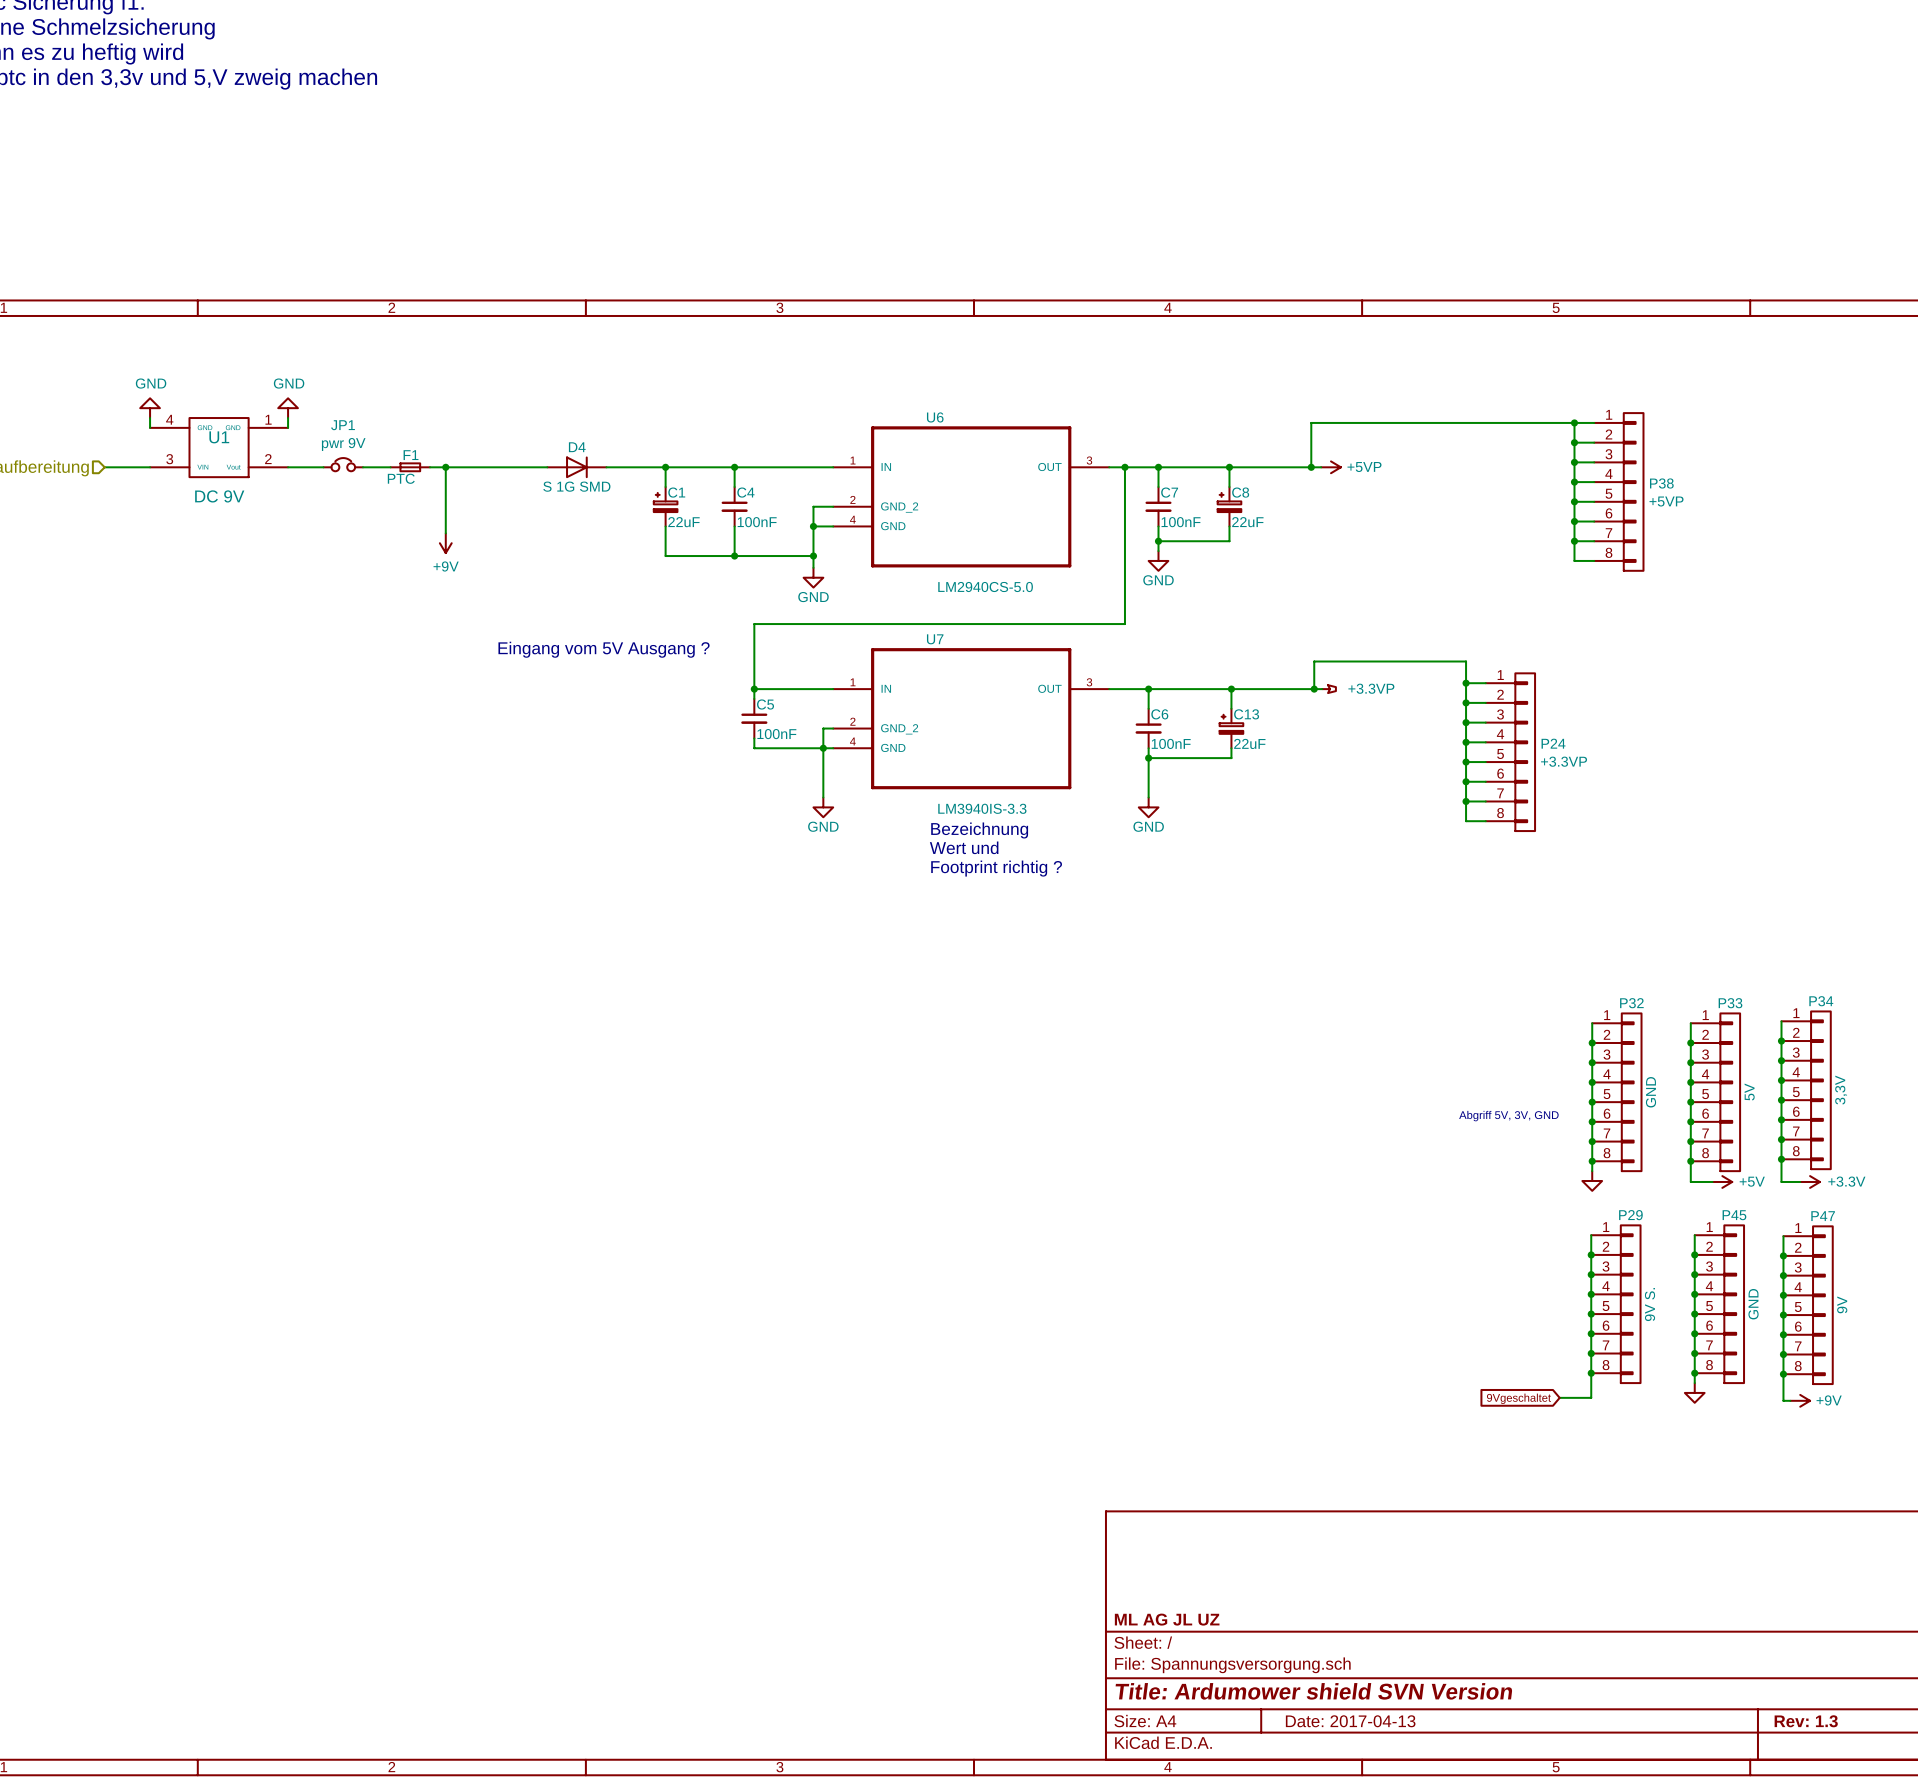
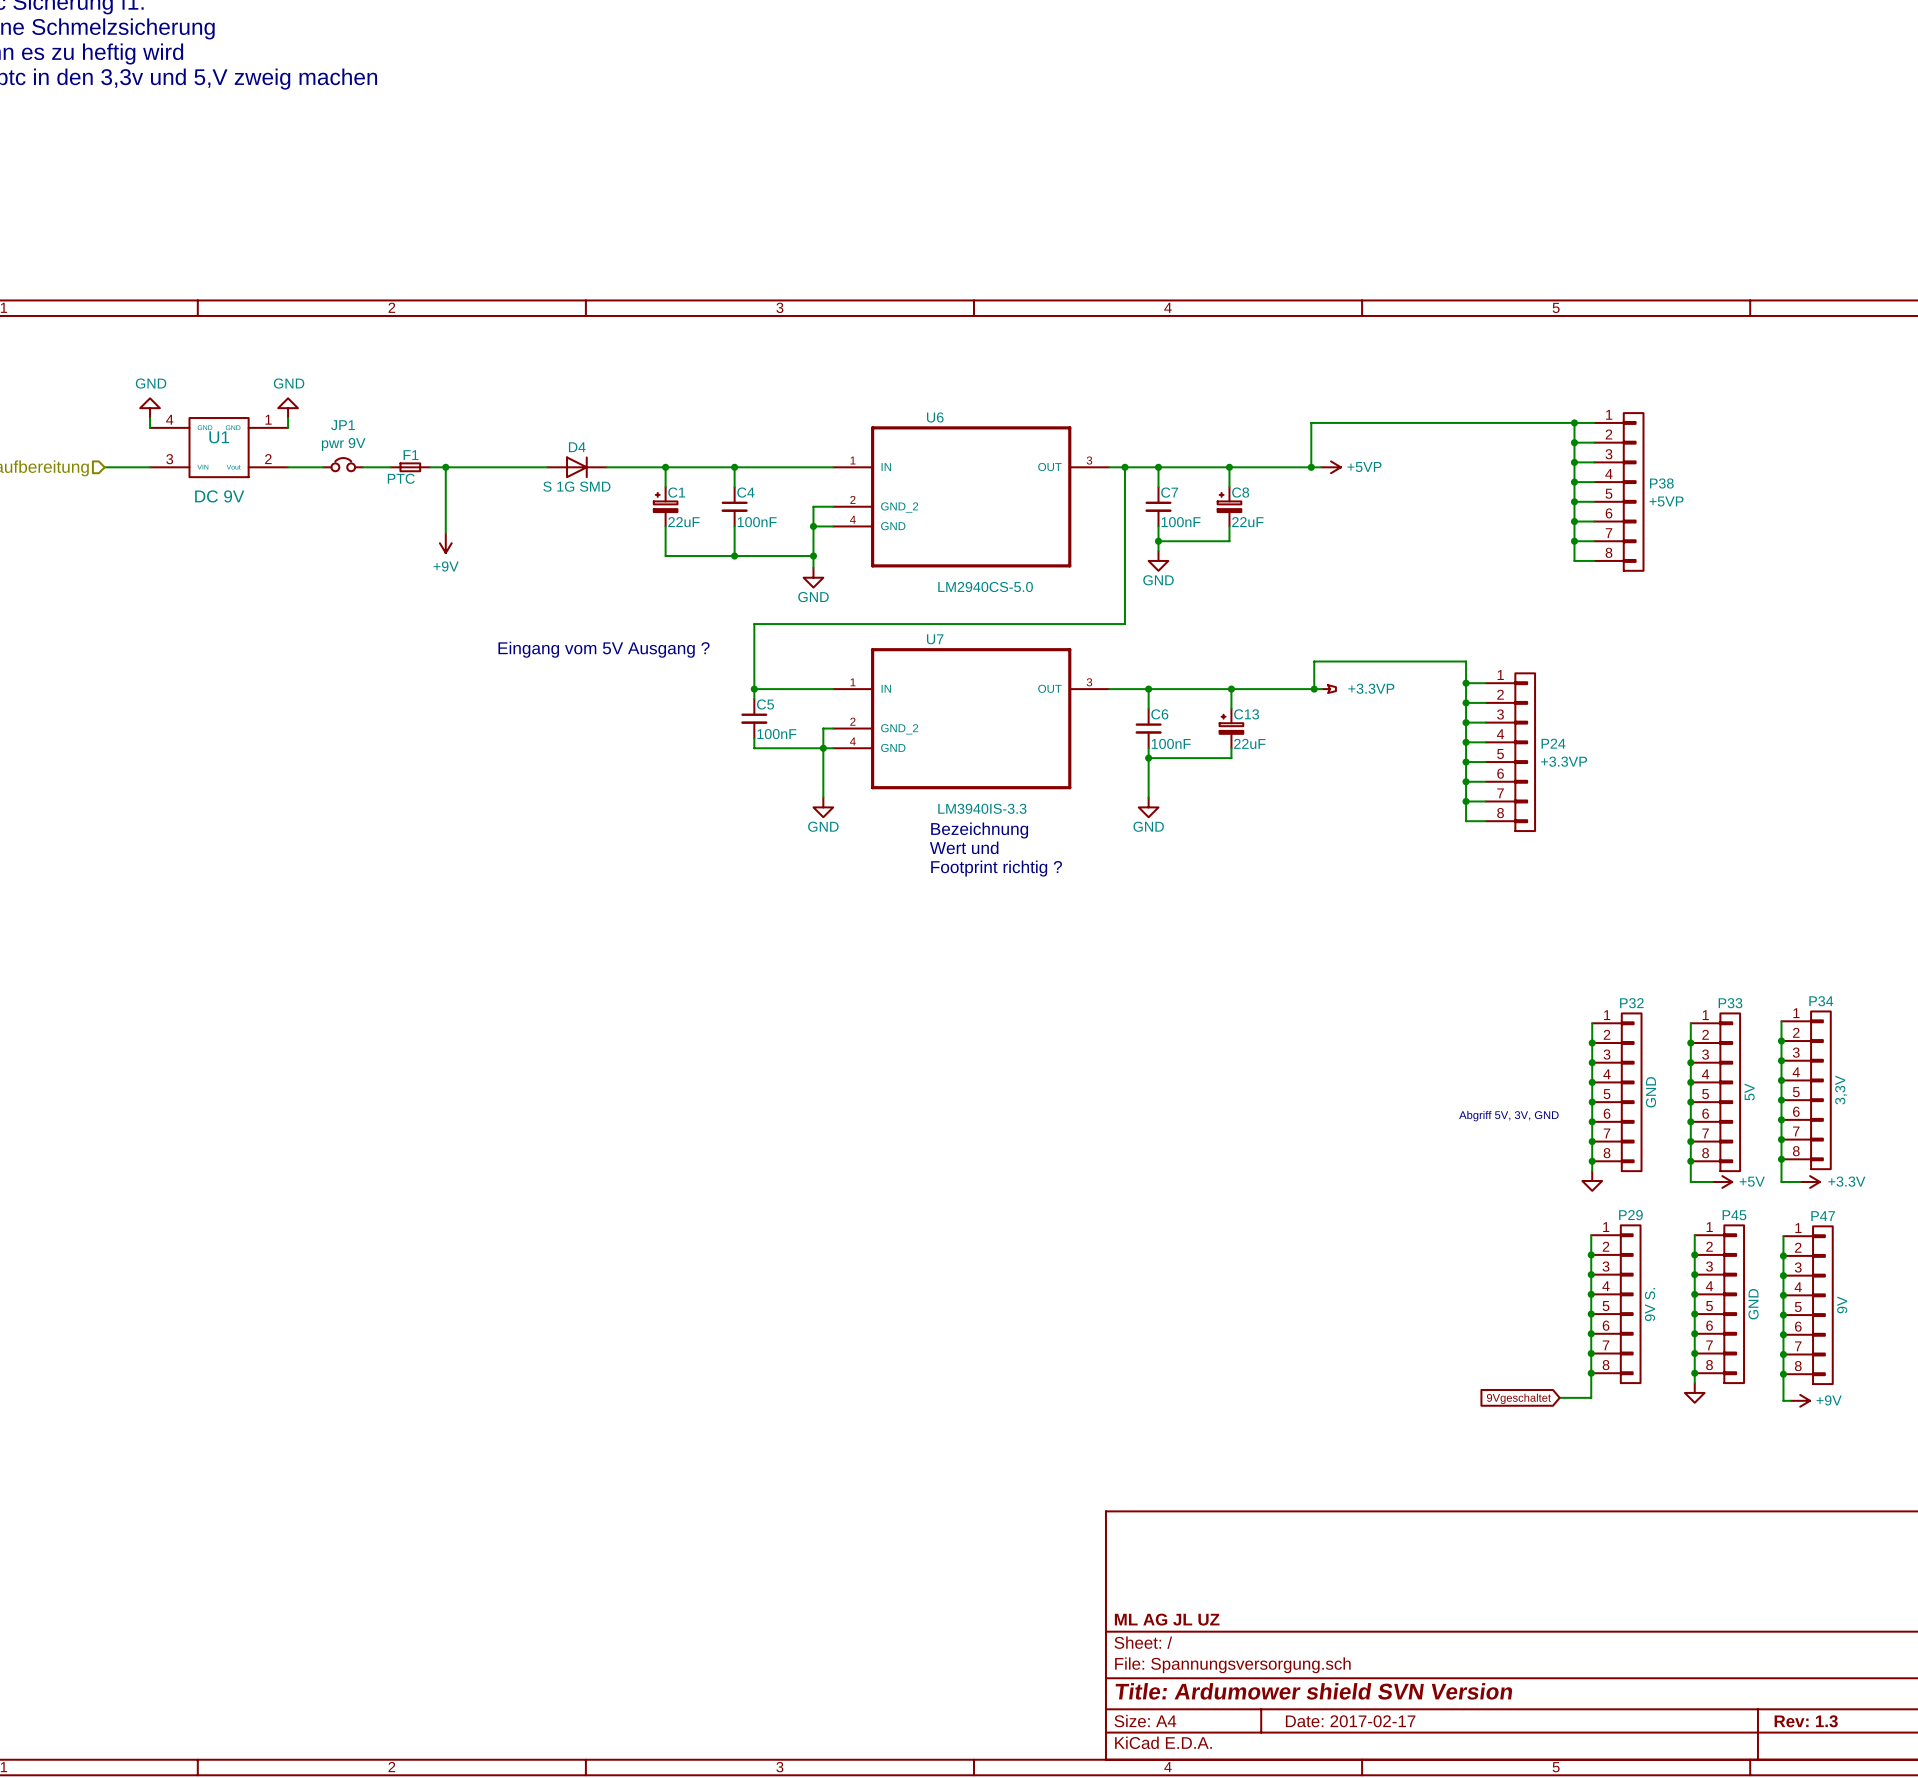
title block: Date: 2017-04-13 (1350, 1721) -> Date: 2017-02-17 (1350, 1721)

